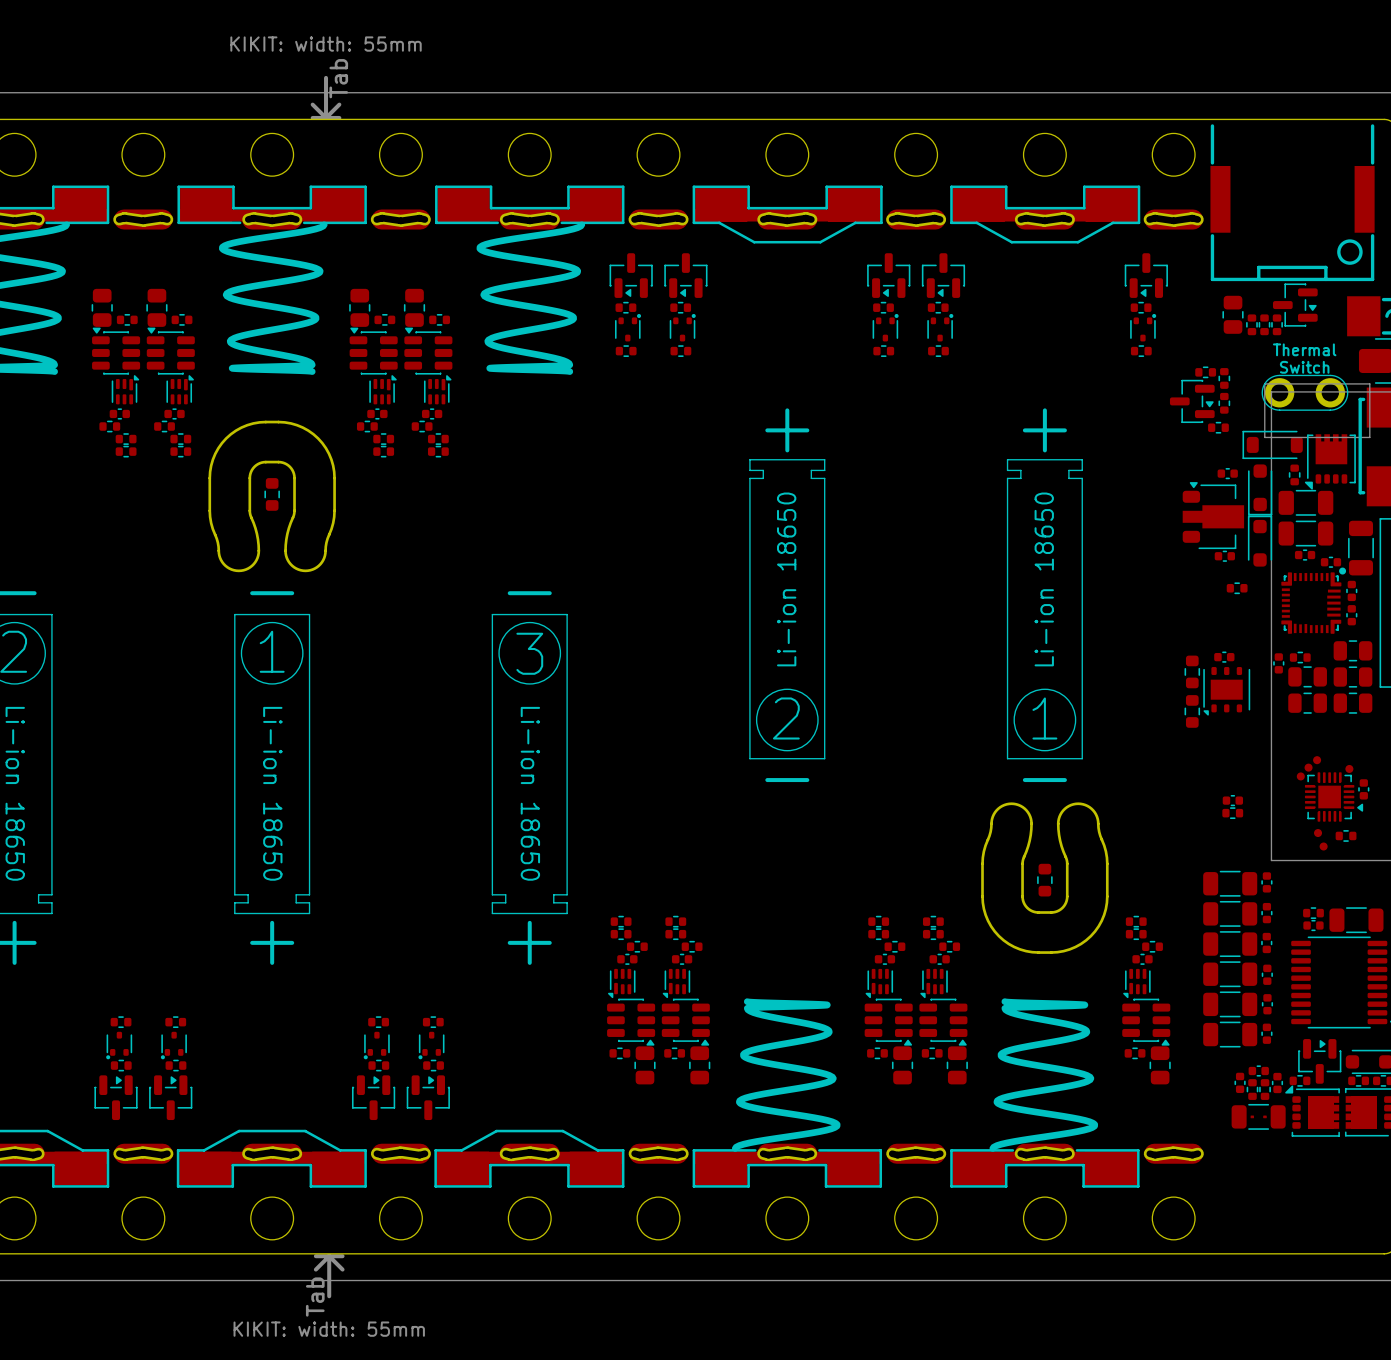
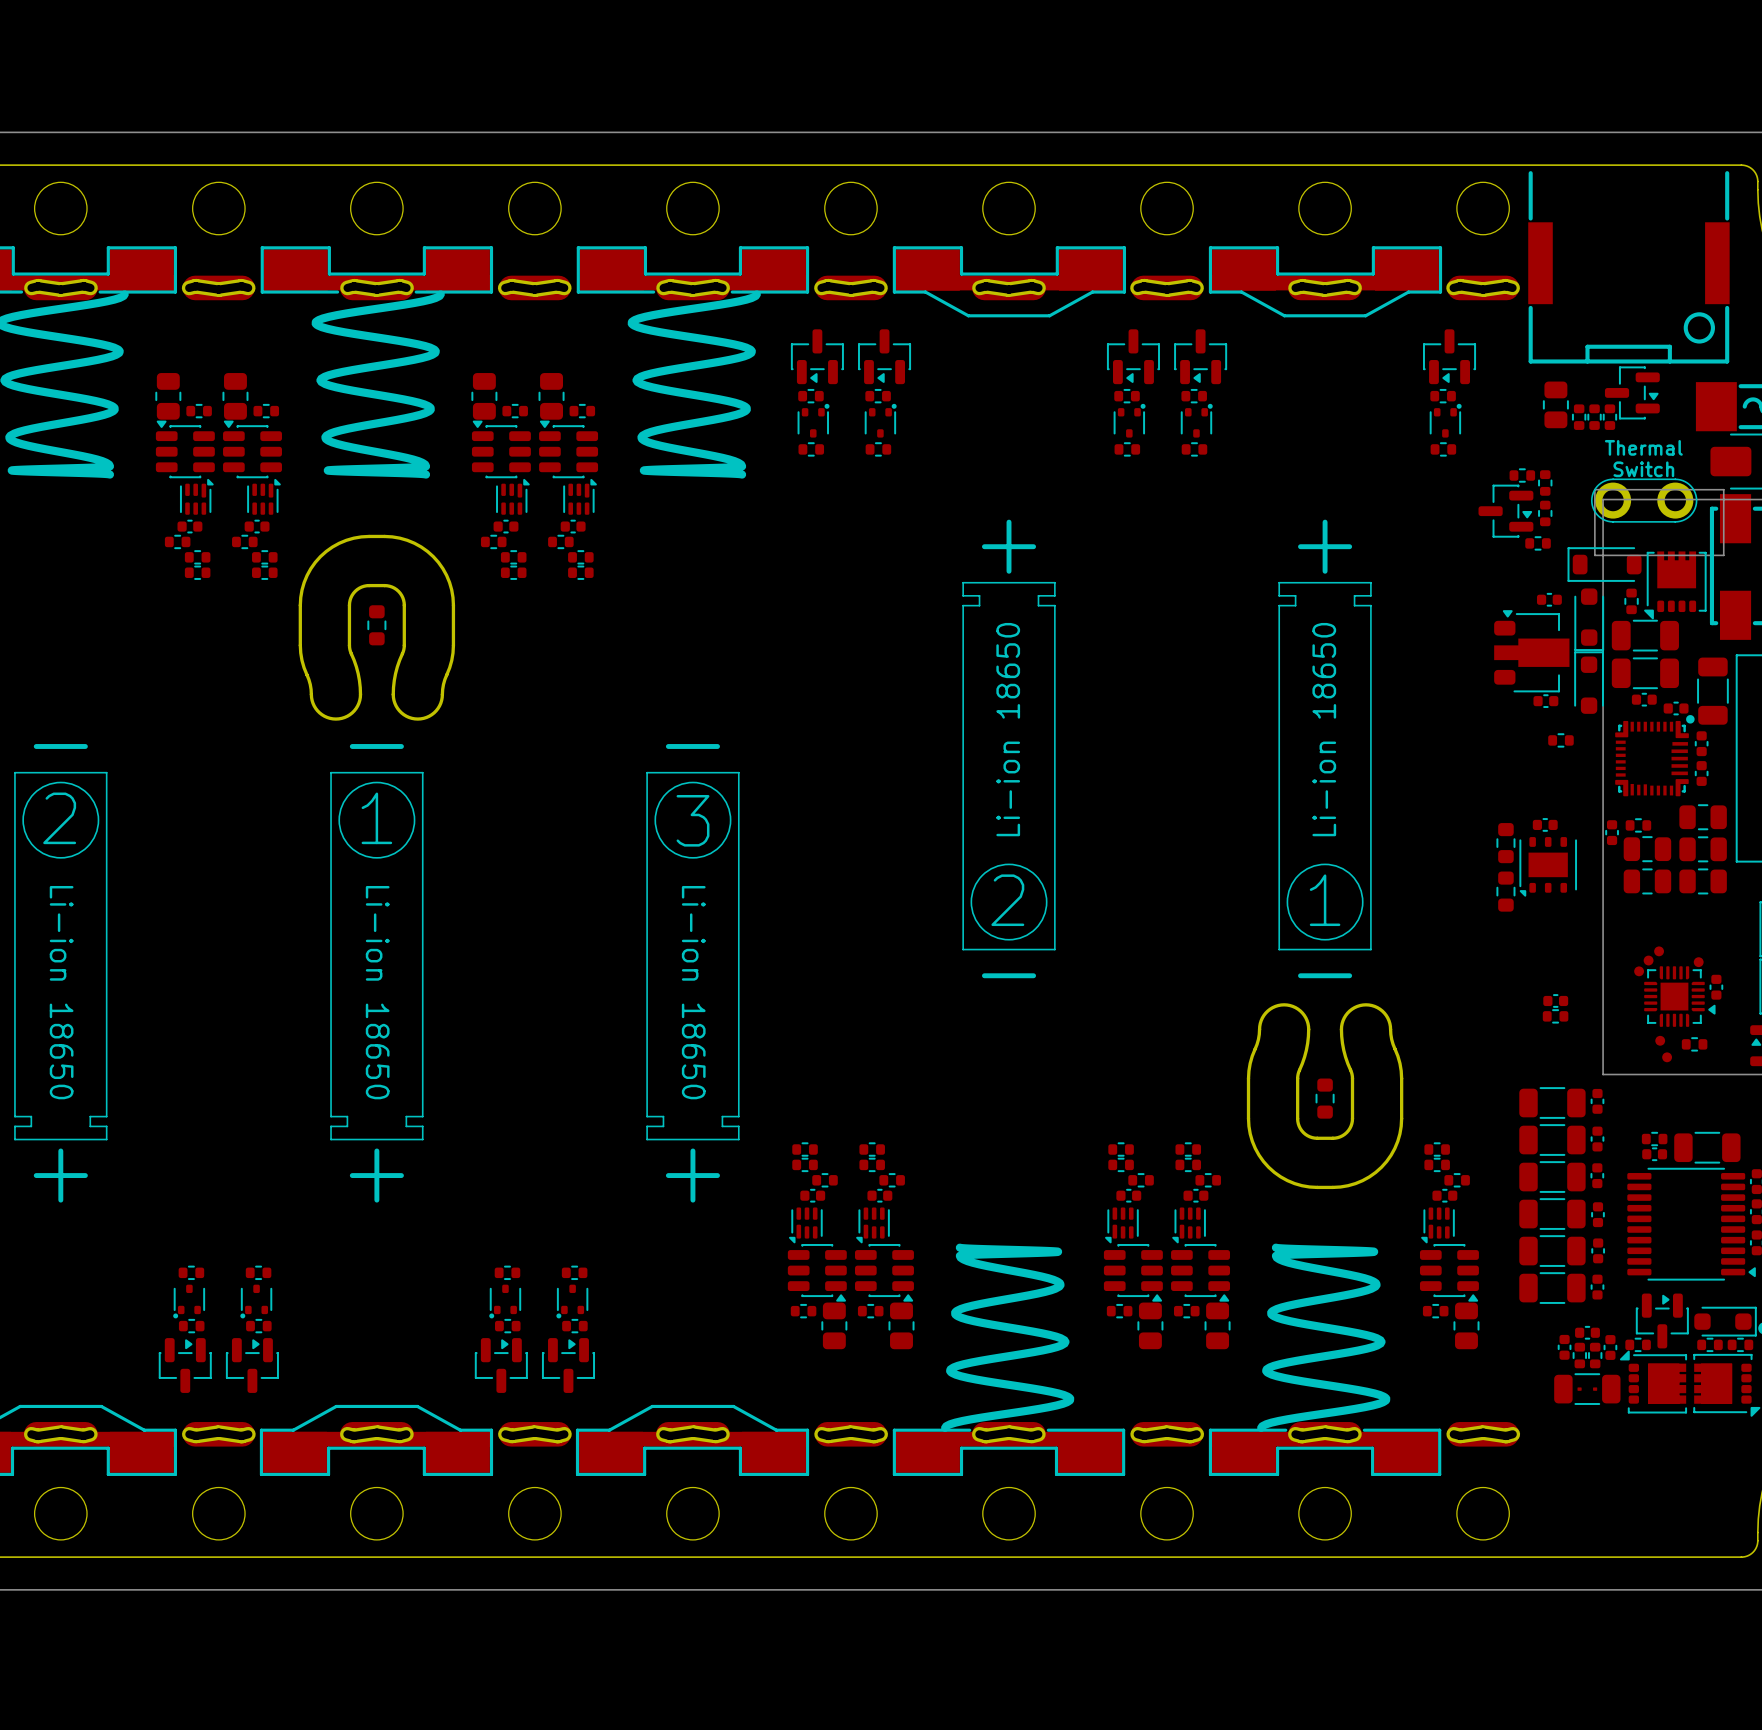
drawing: [310, 75, 342, 120] -> none
drawing: [313, 1254, 345, 1299] -> none

